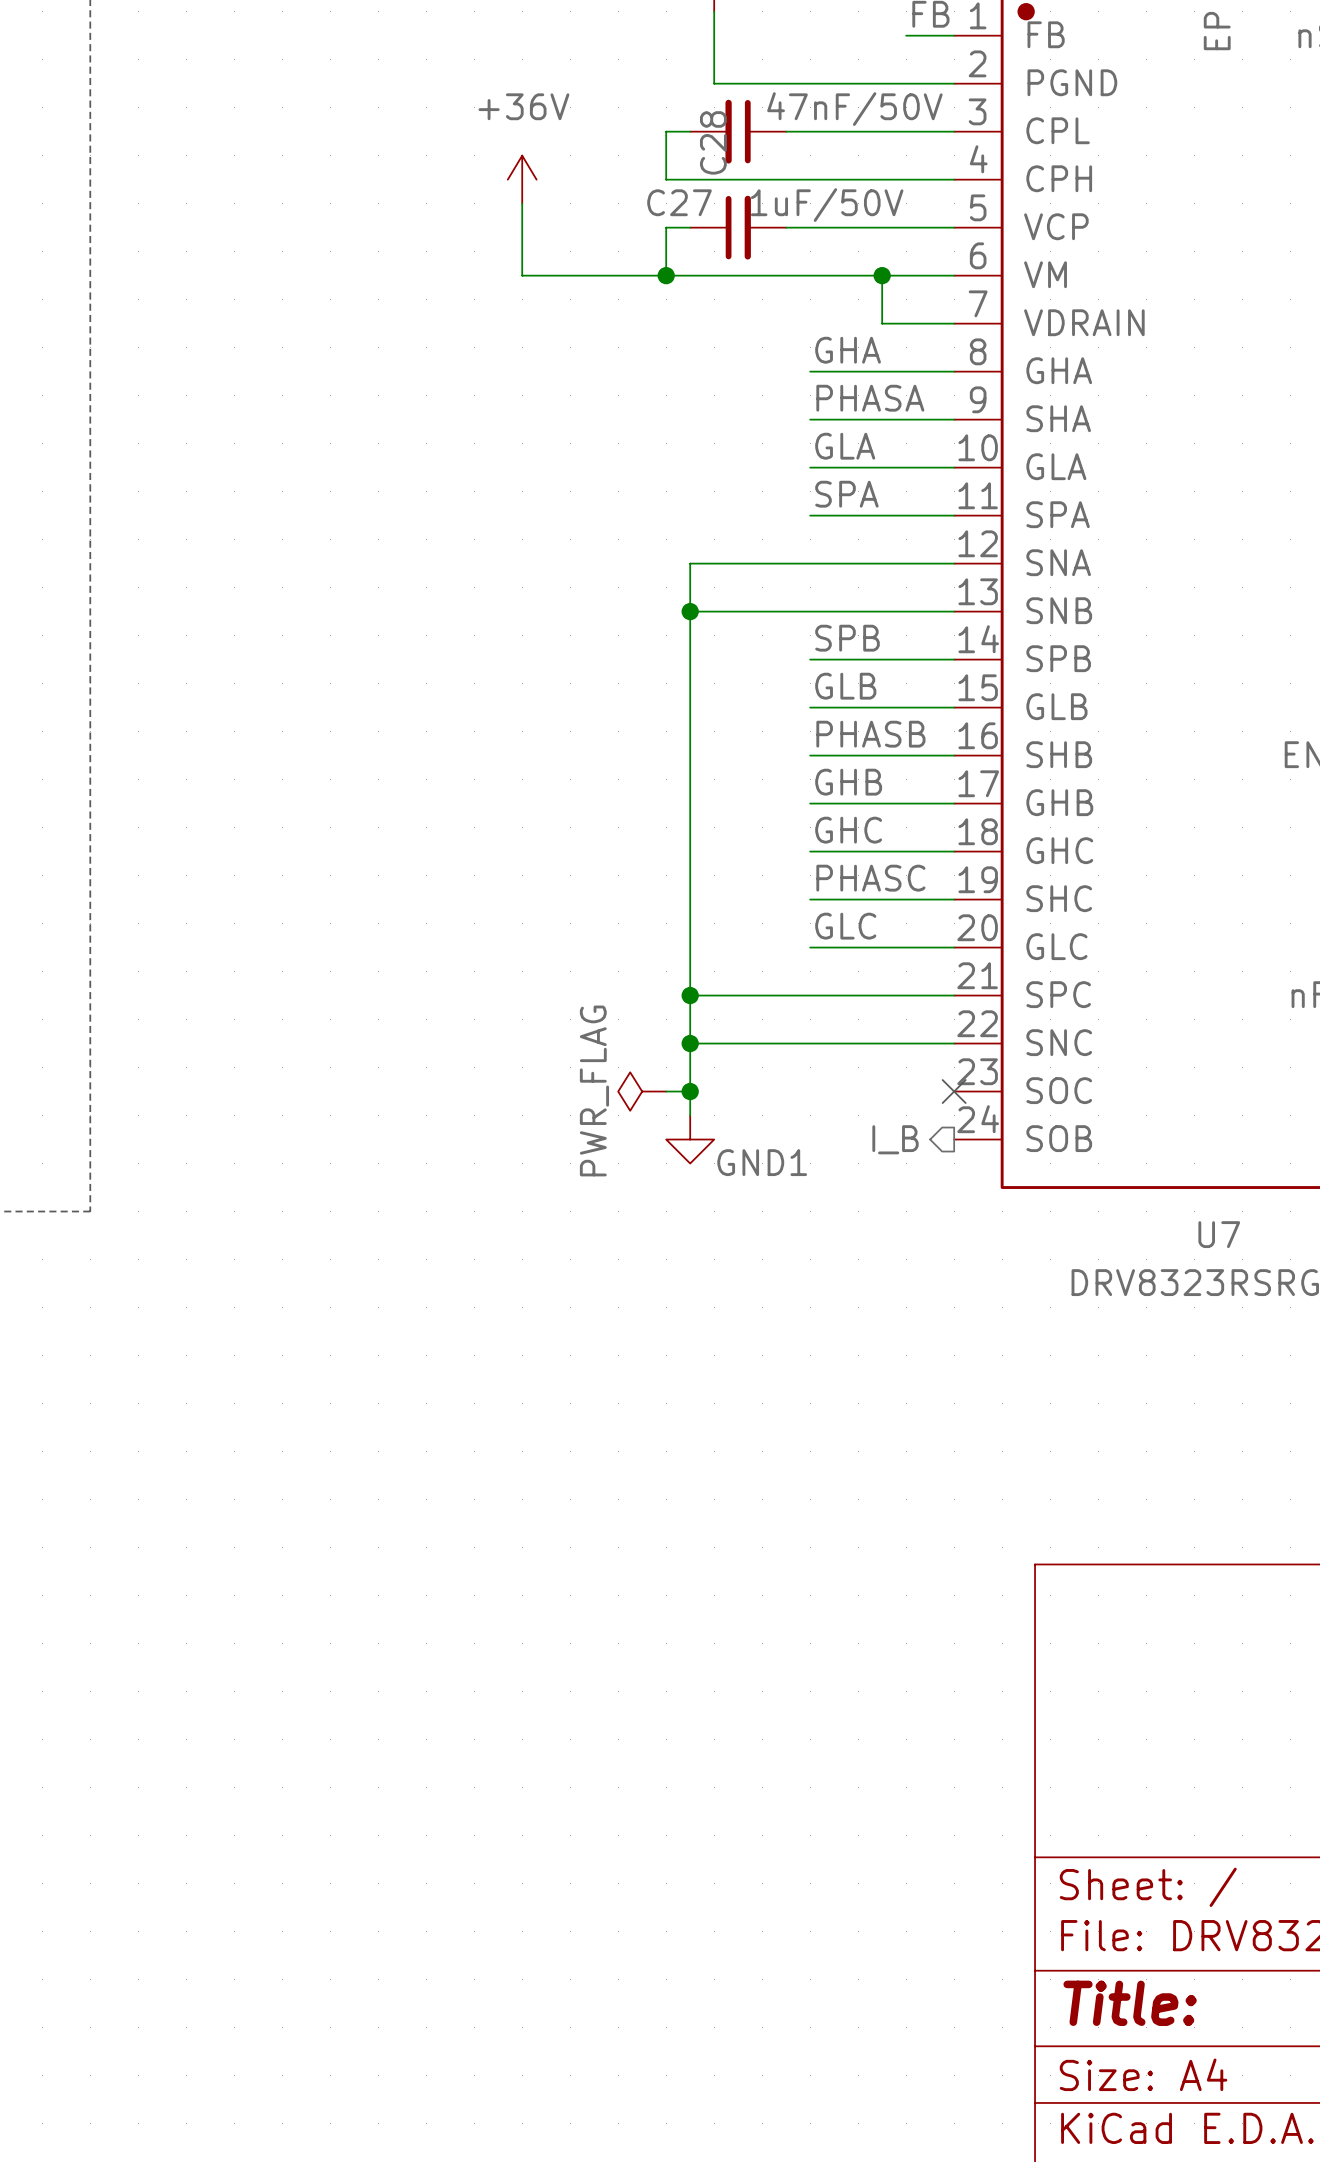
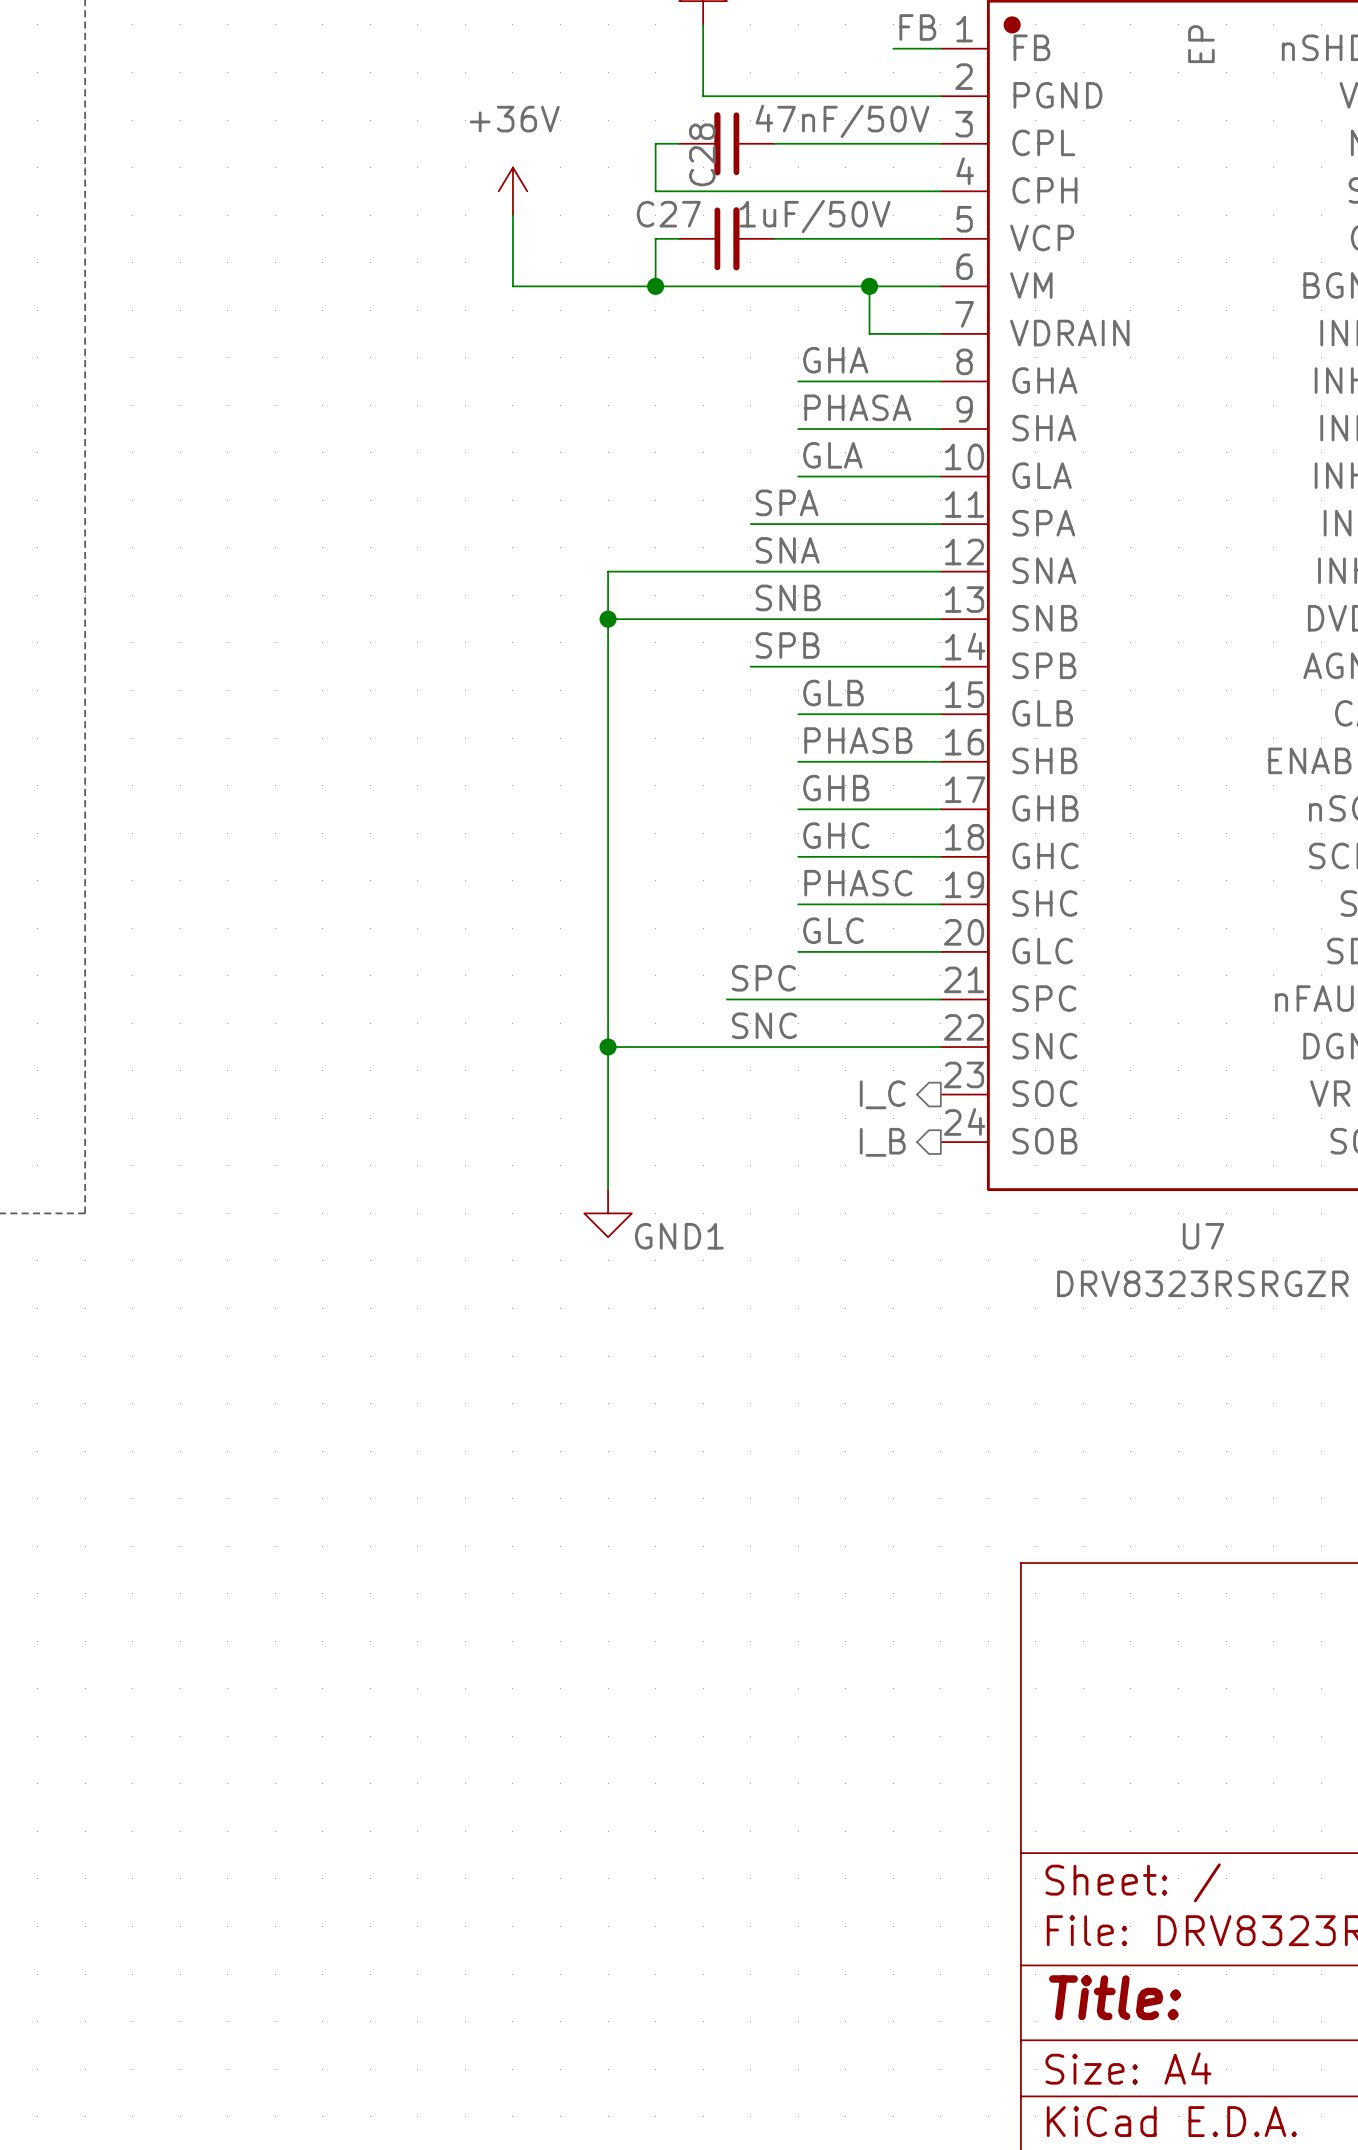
label position: SPA (846, 494) -> SPA (787, 502)
wire: none -> (750, 524) (798, 524)
label: none -> SNA (787, 550)
wire: (690, 563) (690, 1115) -> (679, 571) (608, 571) (608, 1189)
label: none -> SNB (788, 597)
wire: none -> (608, 619) (679, 619)
junction position: (690, 611) -> (608, 619)
label position: SPB (847, 638) -> SPB (787, 645)
label: none -> SPC (763, 978)
wire: (690, 995) (738, 995) -> (750, 666) (798, 666)
junction: (690, 995) -> none
label: none -> SNC (764, 1025)
wire: none -> (608, 1047) (679, 1047)
junction: none -> (608, 1047)
junction: (690, 1043) -> none
power symbol: PWR_FLAG (642, 1091) -> none
wire: (666, 1091) (690, 1091) -> none
junction: (690, 1091) -> none
hierarchical label: none -> I_C (882, 1094)
no-connect mark: (954, 1091) -> none
power symbol position: GND1 (690, 1139) -> GND1 (608, 1213)

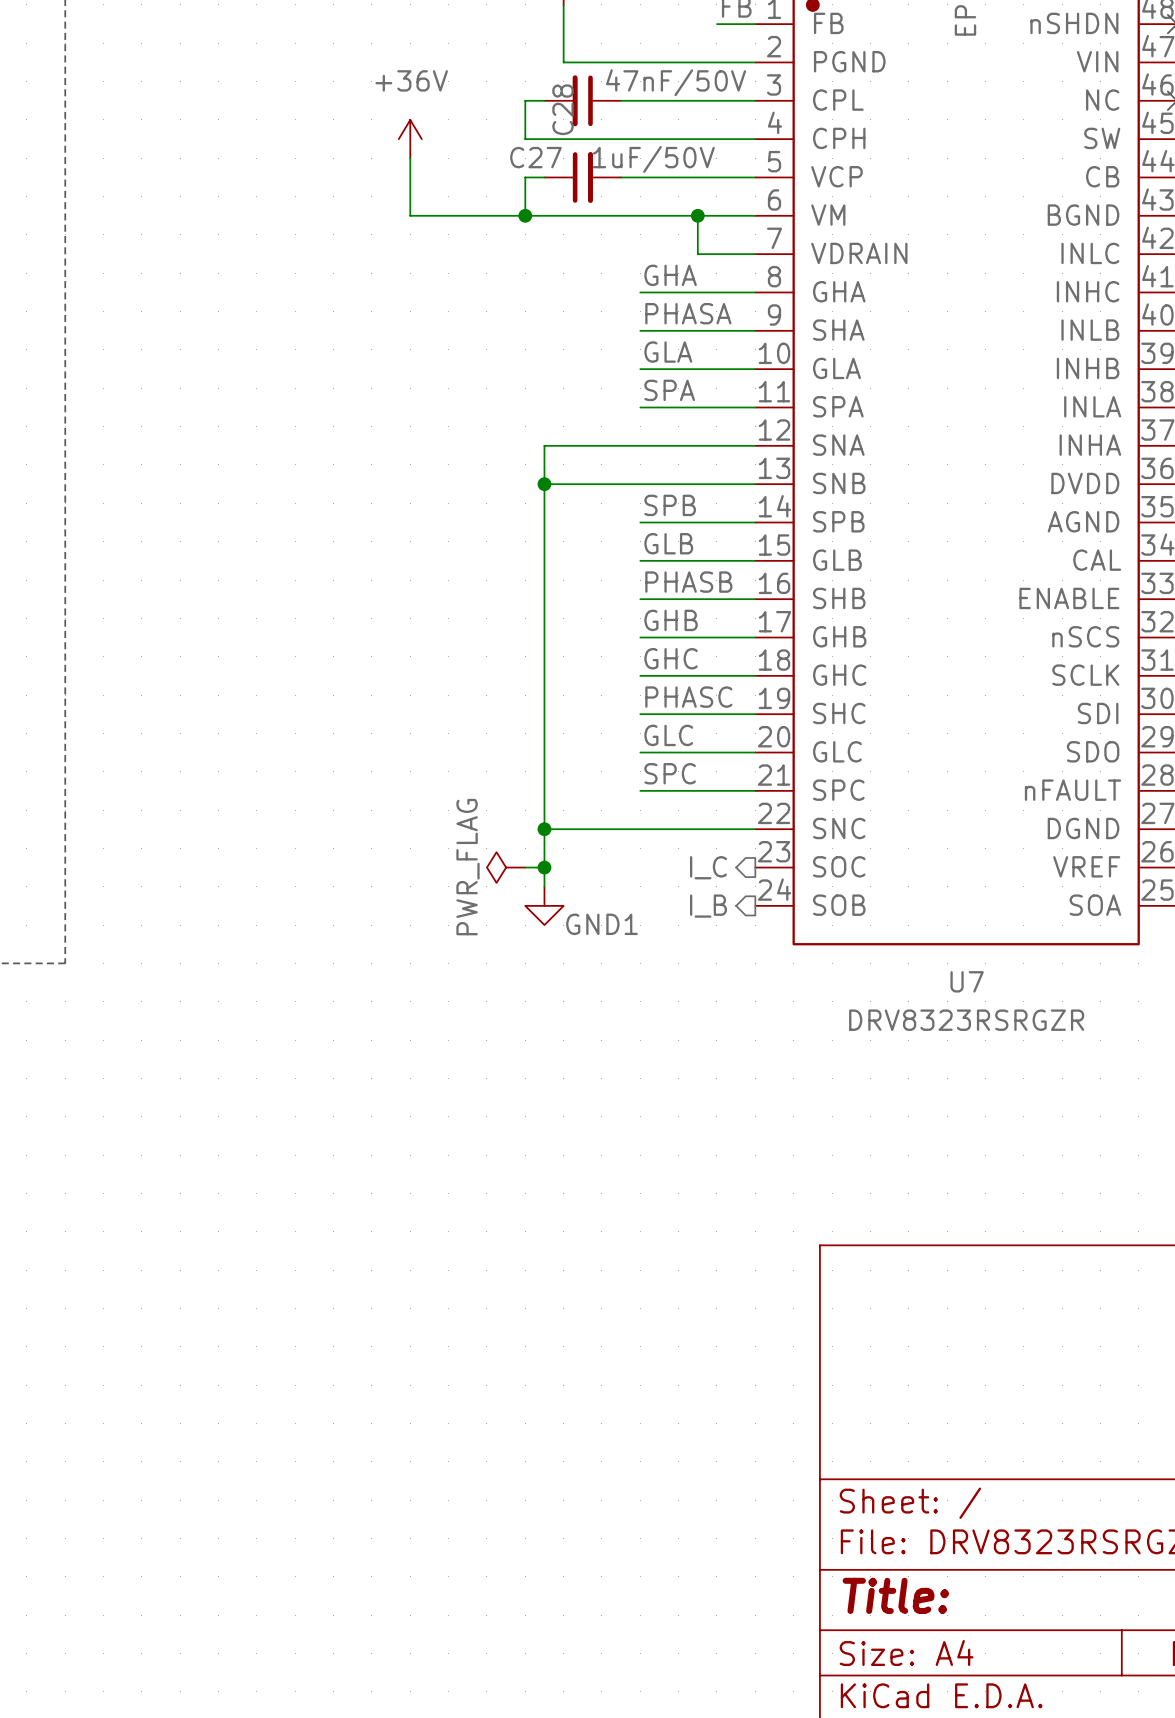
label position: SPA (787, 502) -> SPA (669, 390)
wire: (750, 524) (798, 524) -> none
label: SNA (787, 550) -> none
wire: (679, 571) (608, 571) (608, 1189) -> (544, 445) (544, 886)
label: SNB (788, 597) -> none
wire: (608, 619) (679, 619) -> none
junction position: (608, 619) -> (544, 484)
label position: SPB (787, 645) -> SPB (670, 505)
wire: (750, 666) (798, 666) -> none
label position: SPC (763, 978) -> SPC (670, 773)
wire: (726, 999) (798, 999) -> none
label: SNC (764, 1025) -> none
wire: (608, 1047) (679, 1047) -> none
junction: (608, 1047) -> none
junction: none -> (544, 829)
power symbol: none -> PWR_FLAG (506, 867)
wire: none -> (525, 867) (544, 867)
junction: none -> (544, 867)
power symbol position: GND1 (608, 1213) -> GND1 (544, 905)

